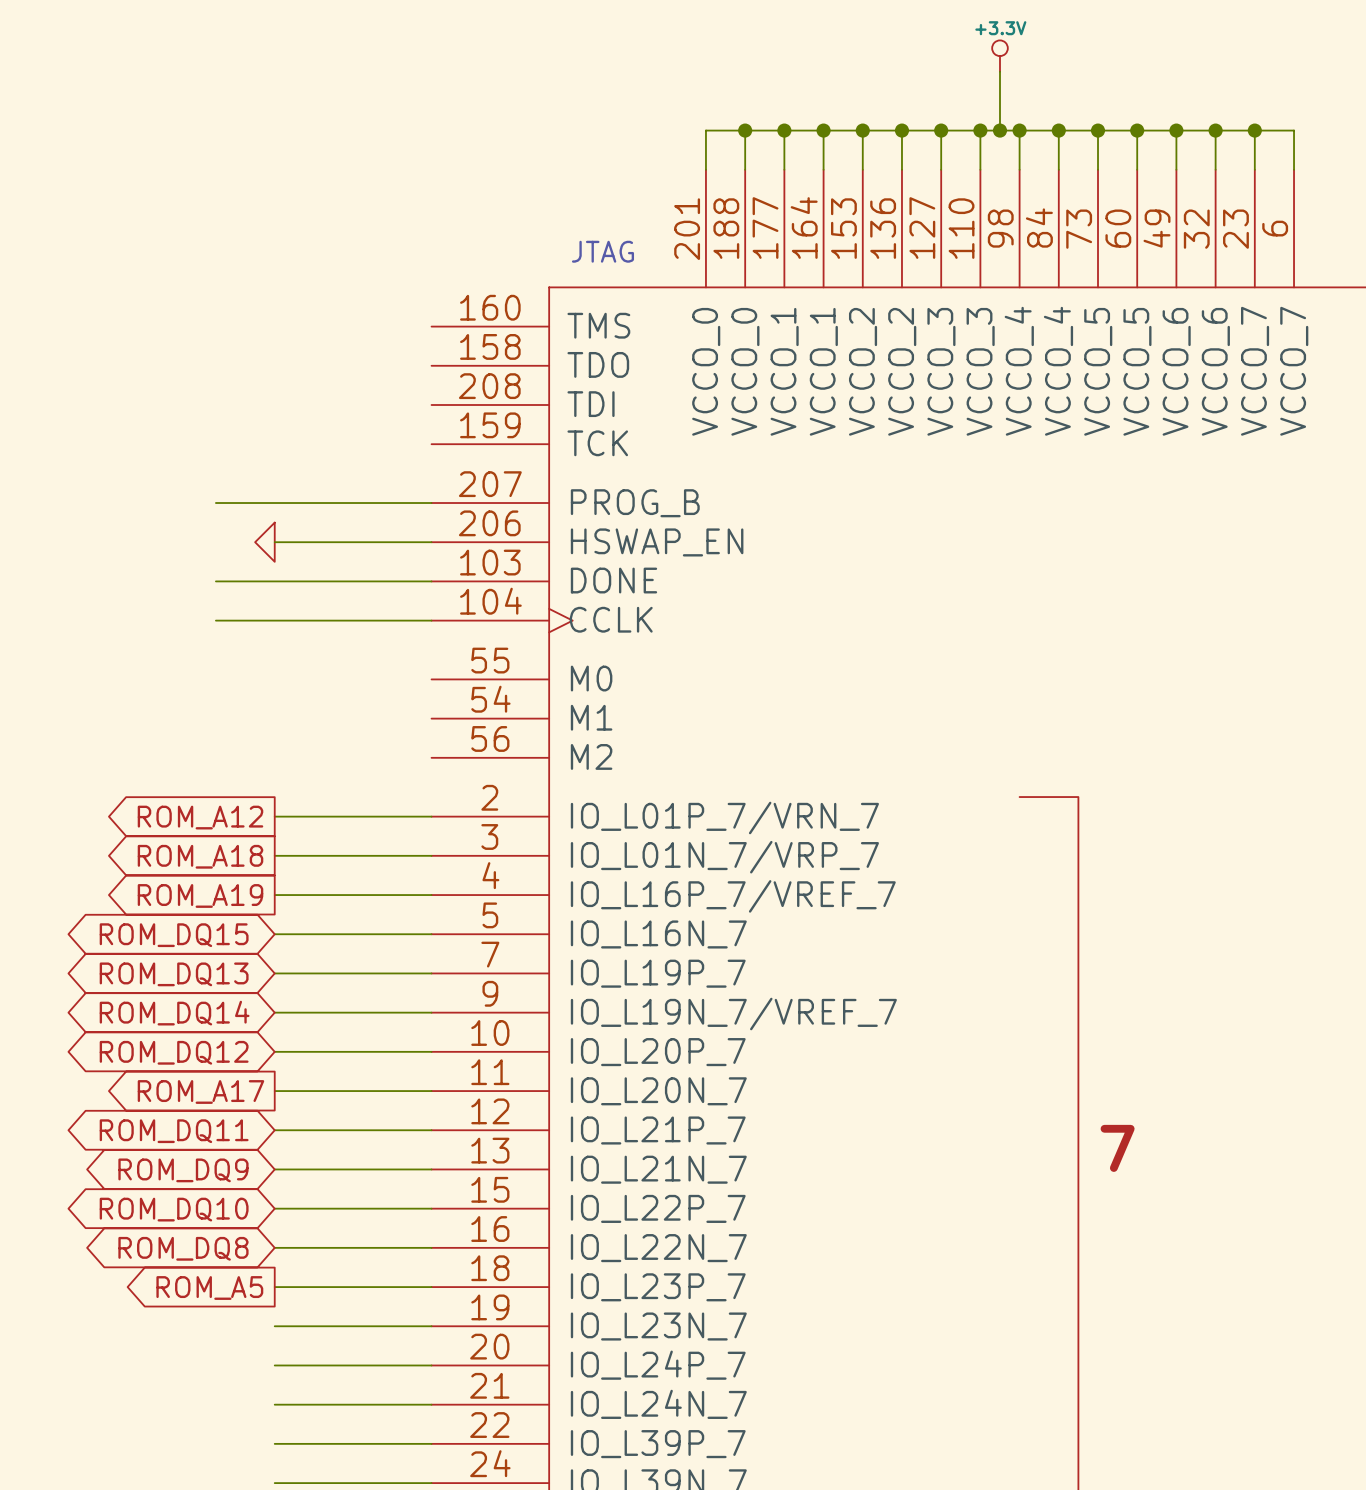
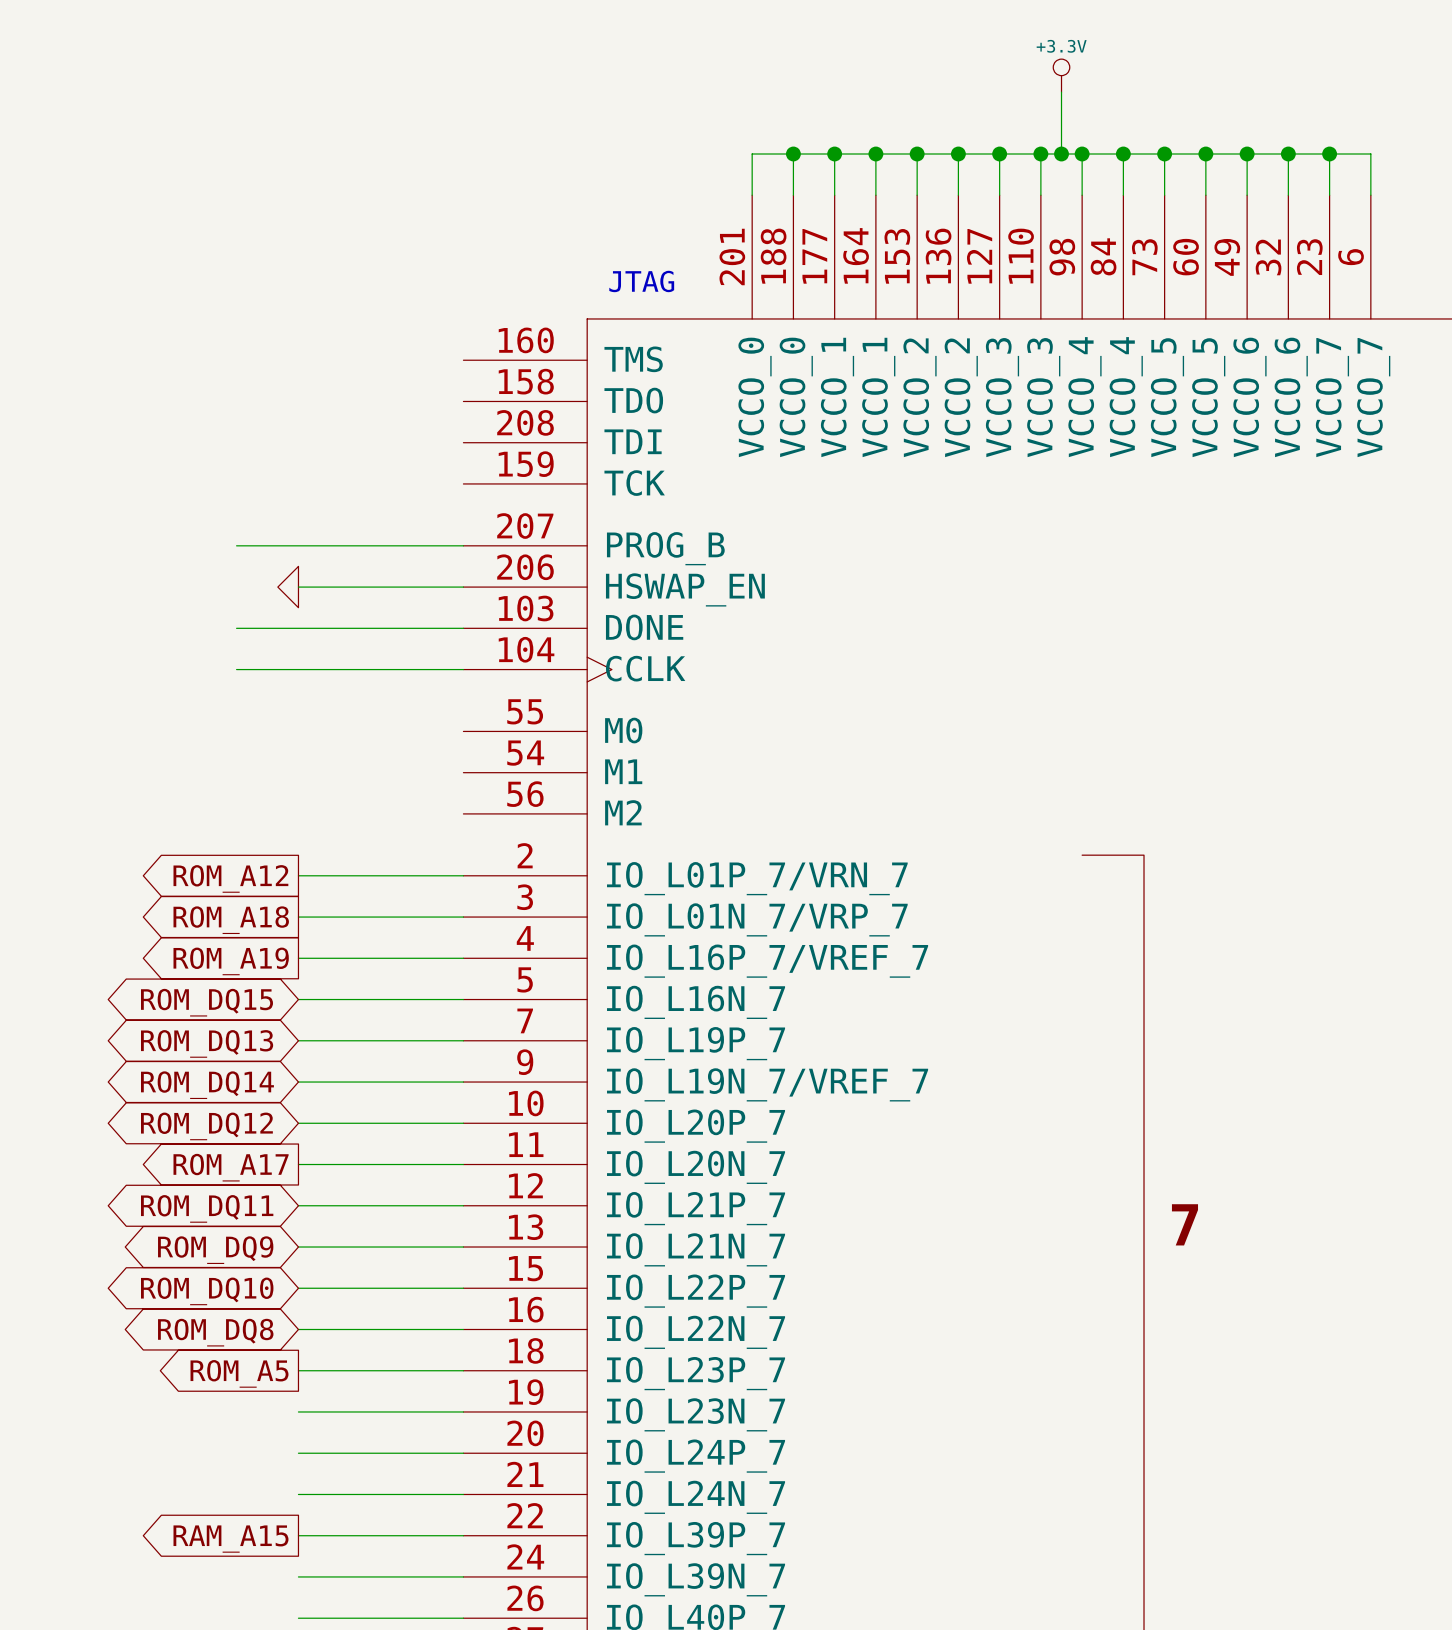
global label: none -> RAM_A15 (230, 1539)

